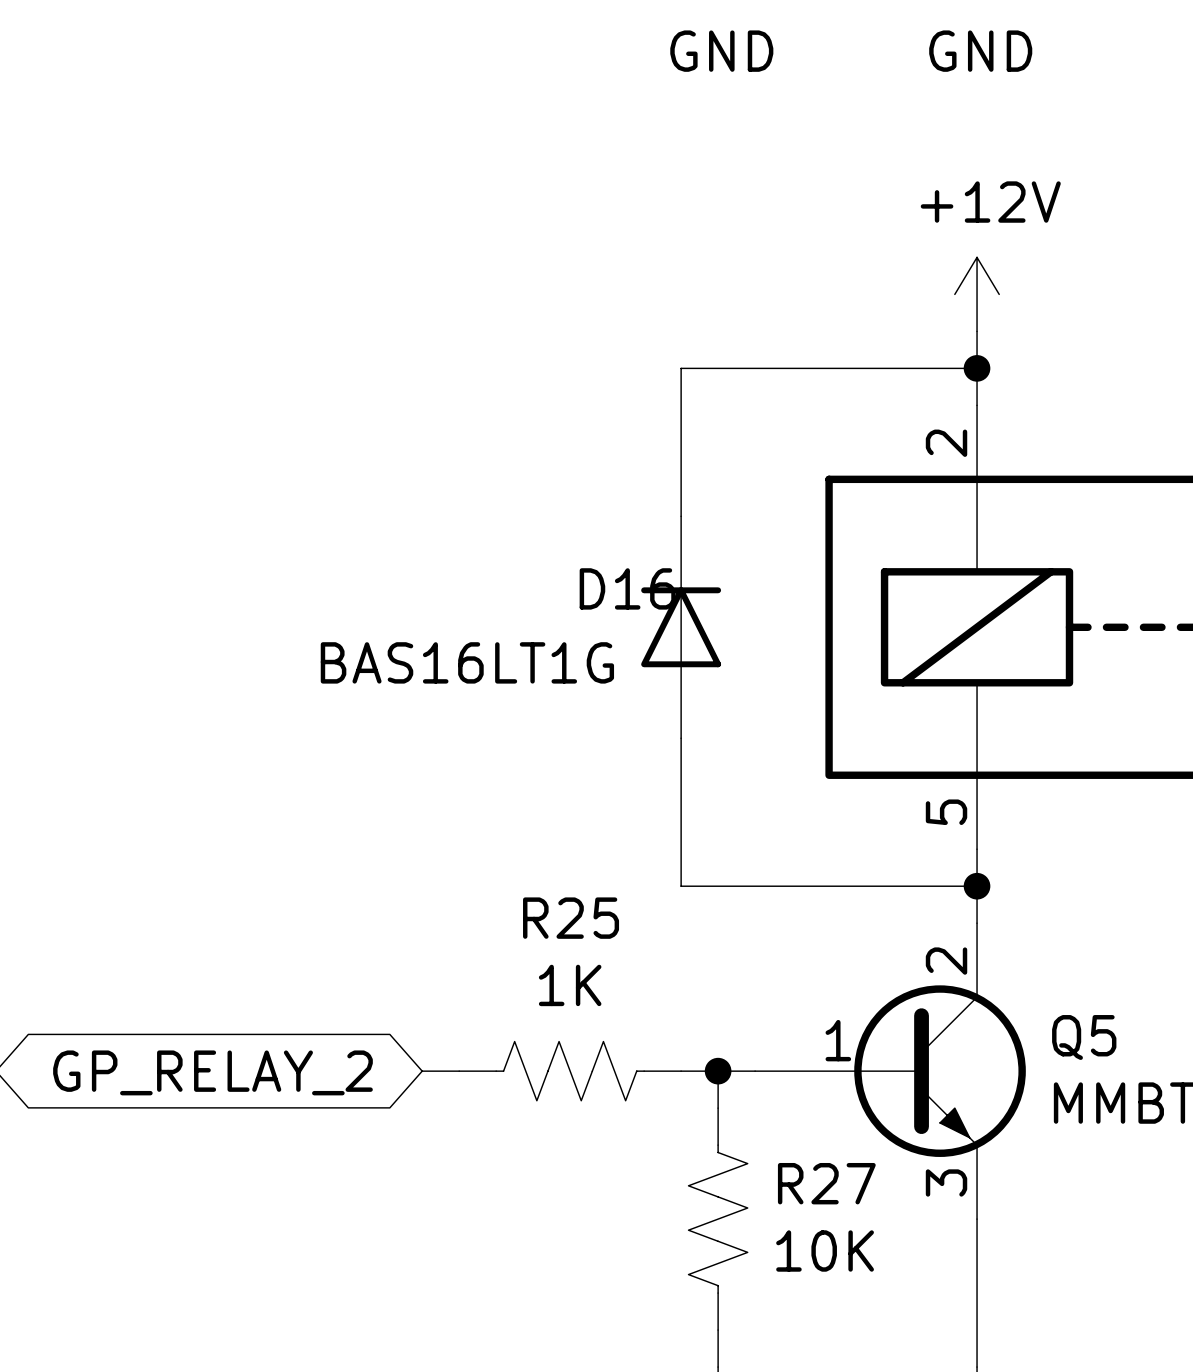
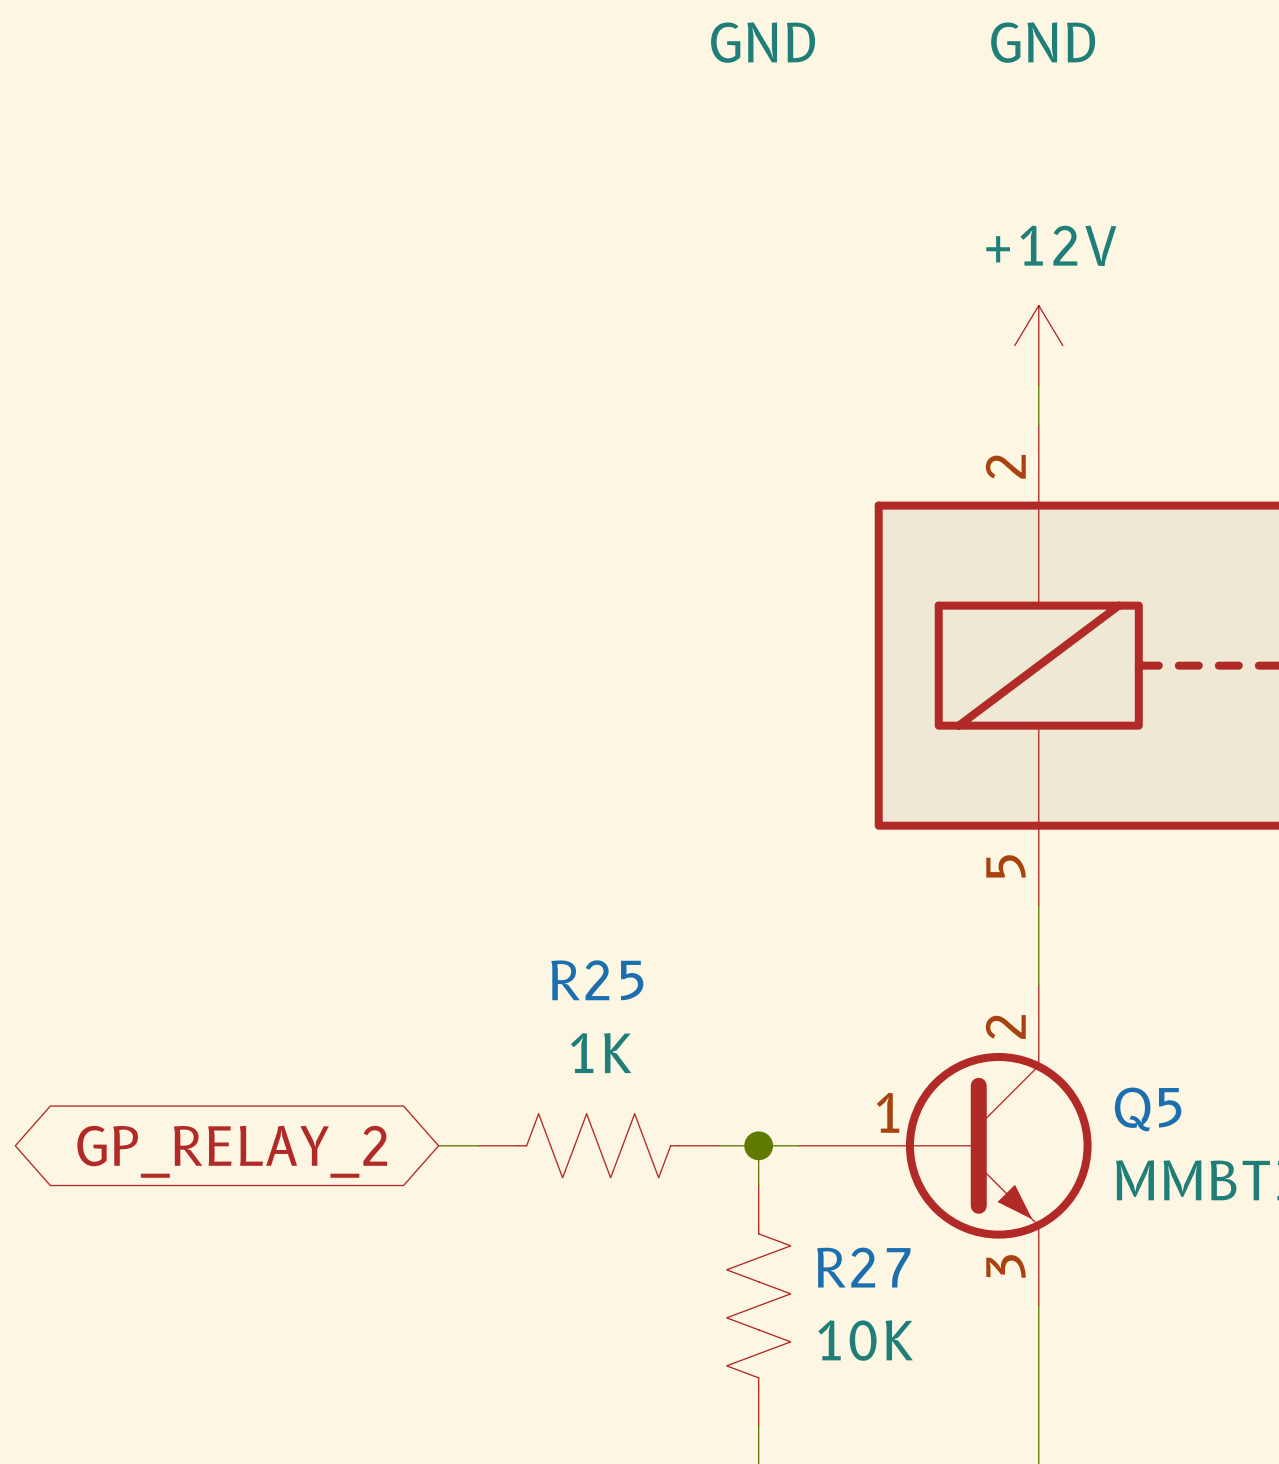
power symbol position: +12V (977, 294) -> +12V (1038, 345)
wire: (977, 331) (977, 368) (681, 368) (681, 516) -> none
junction: (977, 368) -> none
D16: BAS16LT1G (681, 627) -> none
wire: (681, 738) (681, 886) (977, 886) -> none
junction: (977, 886) -> none

